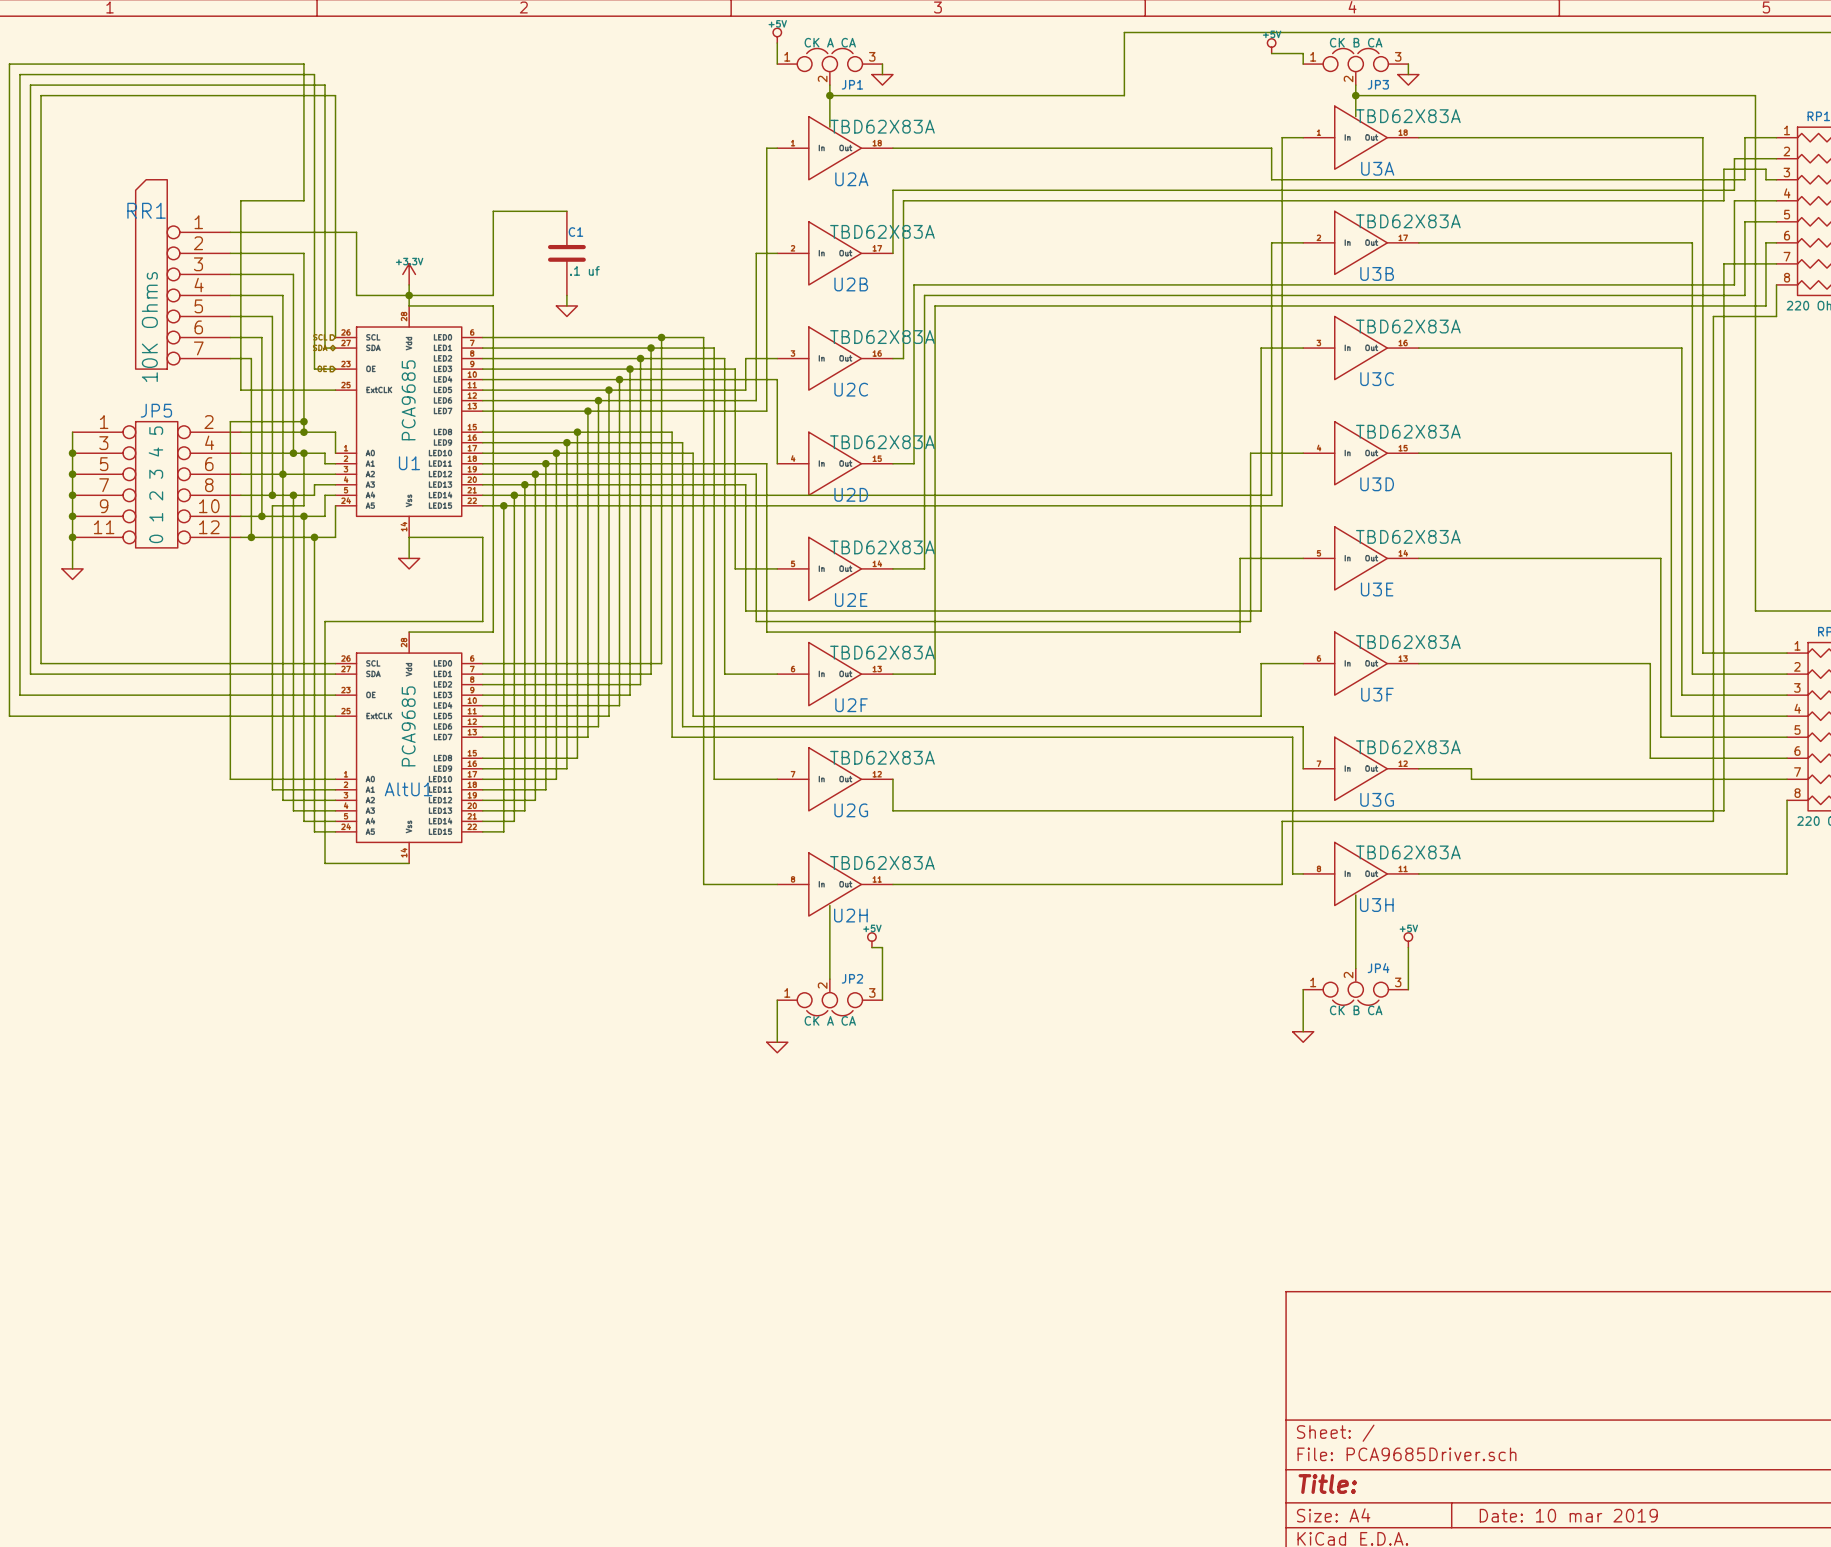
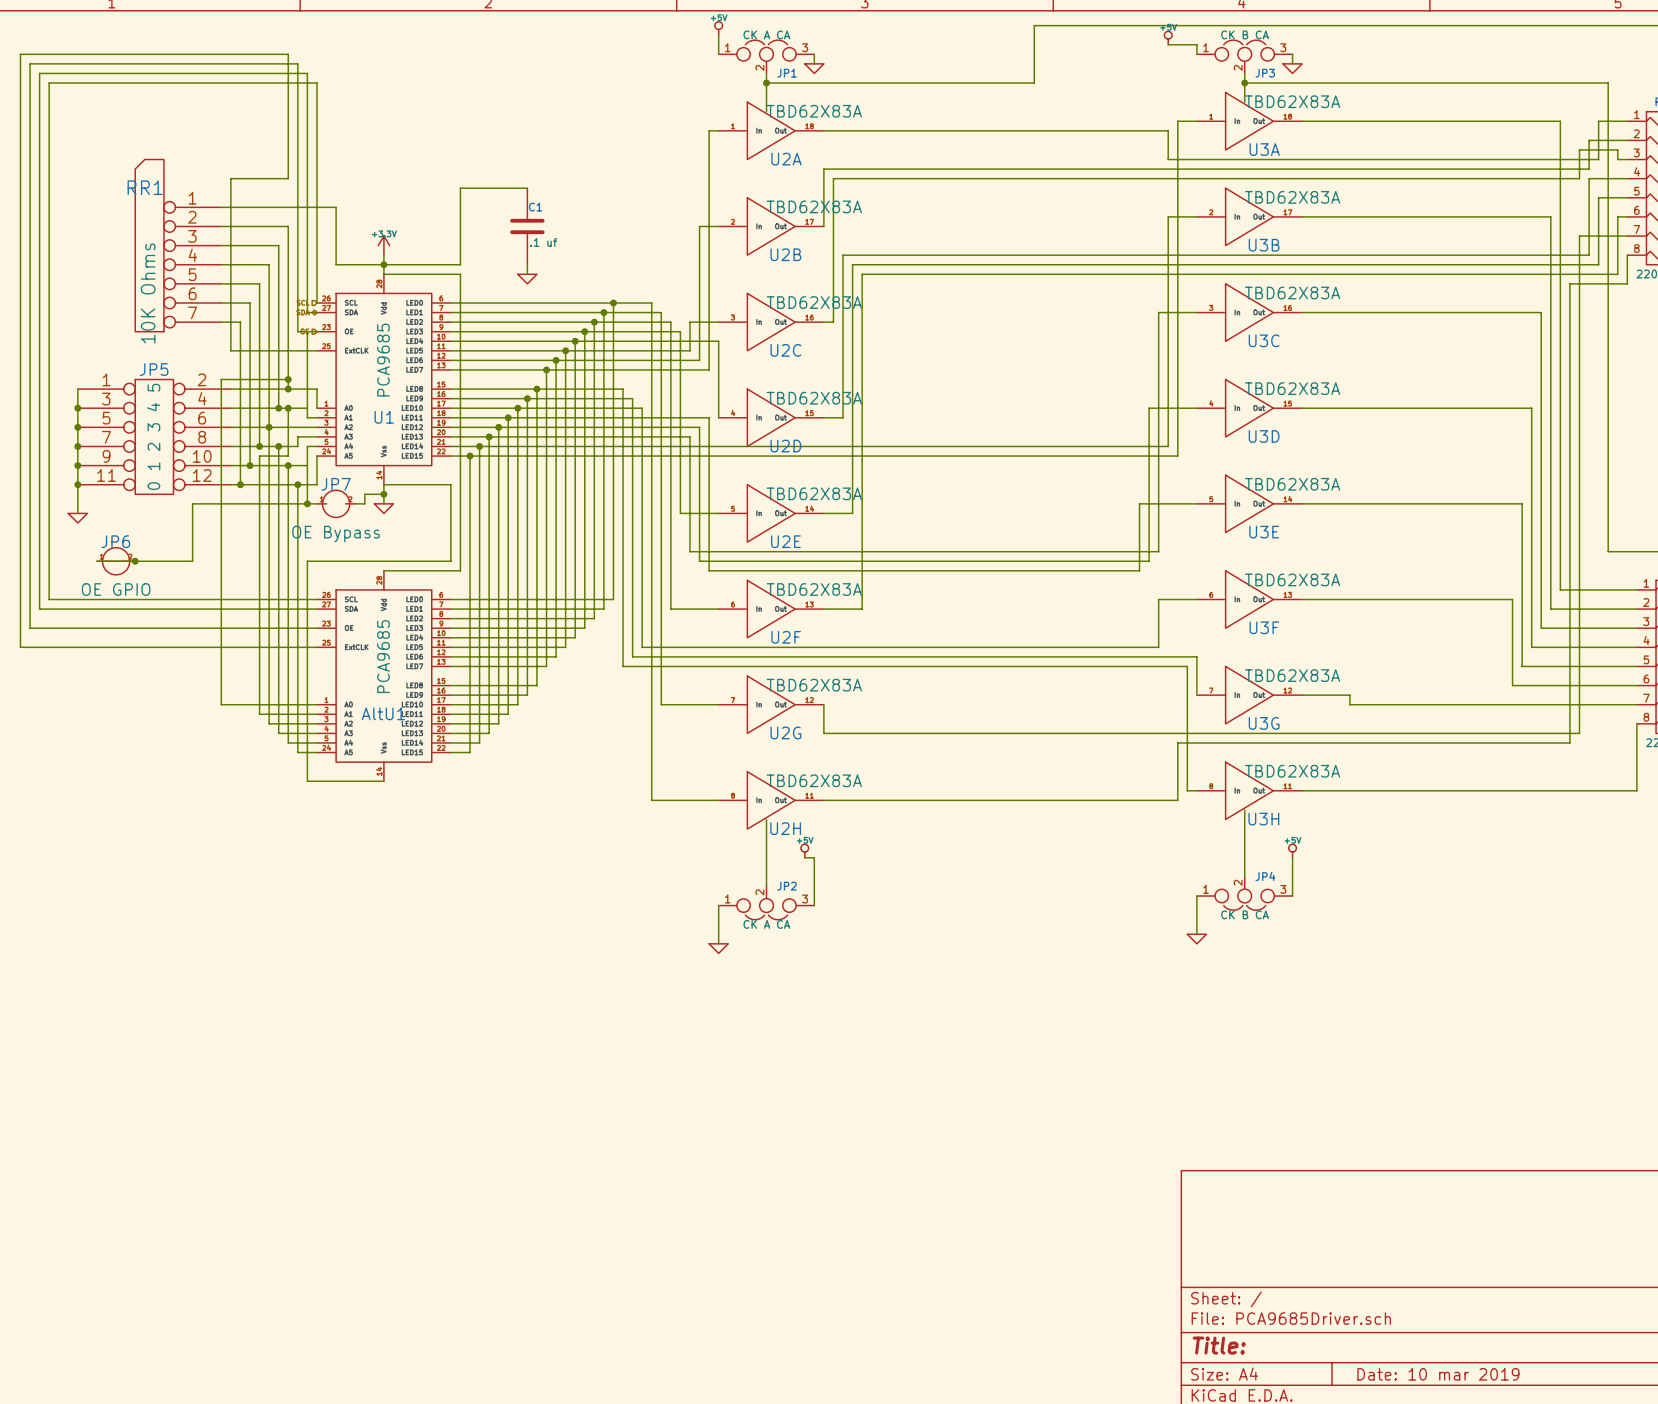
wire: none -> (307, 331) (307, 408)
wire: none -> (307, 465) (307, 503)
wire: none -> (383, 494) (364, 494) (364, 503) (355, 503)
junction: none -> (383, 494)
junction: none -> (307, 503)
wire: none -> (316, 503) (192, 503) (192, 561) (96, 561)
JP7: none -> OE Bypass (336, 503)
JP6: none -> OE GPIO (116, 561)
junction: none -> (135, 561)

